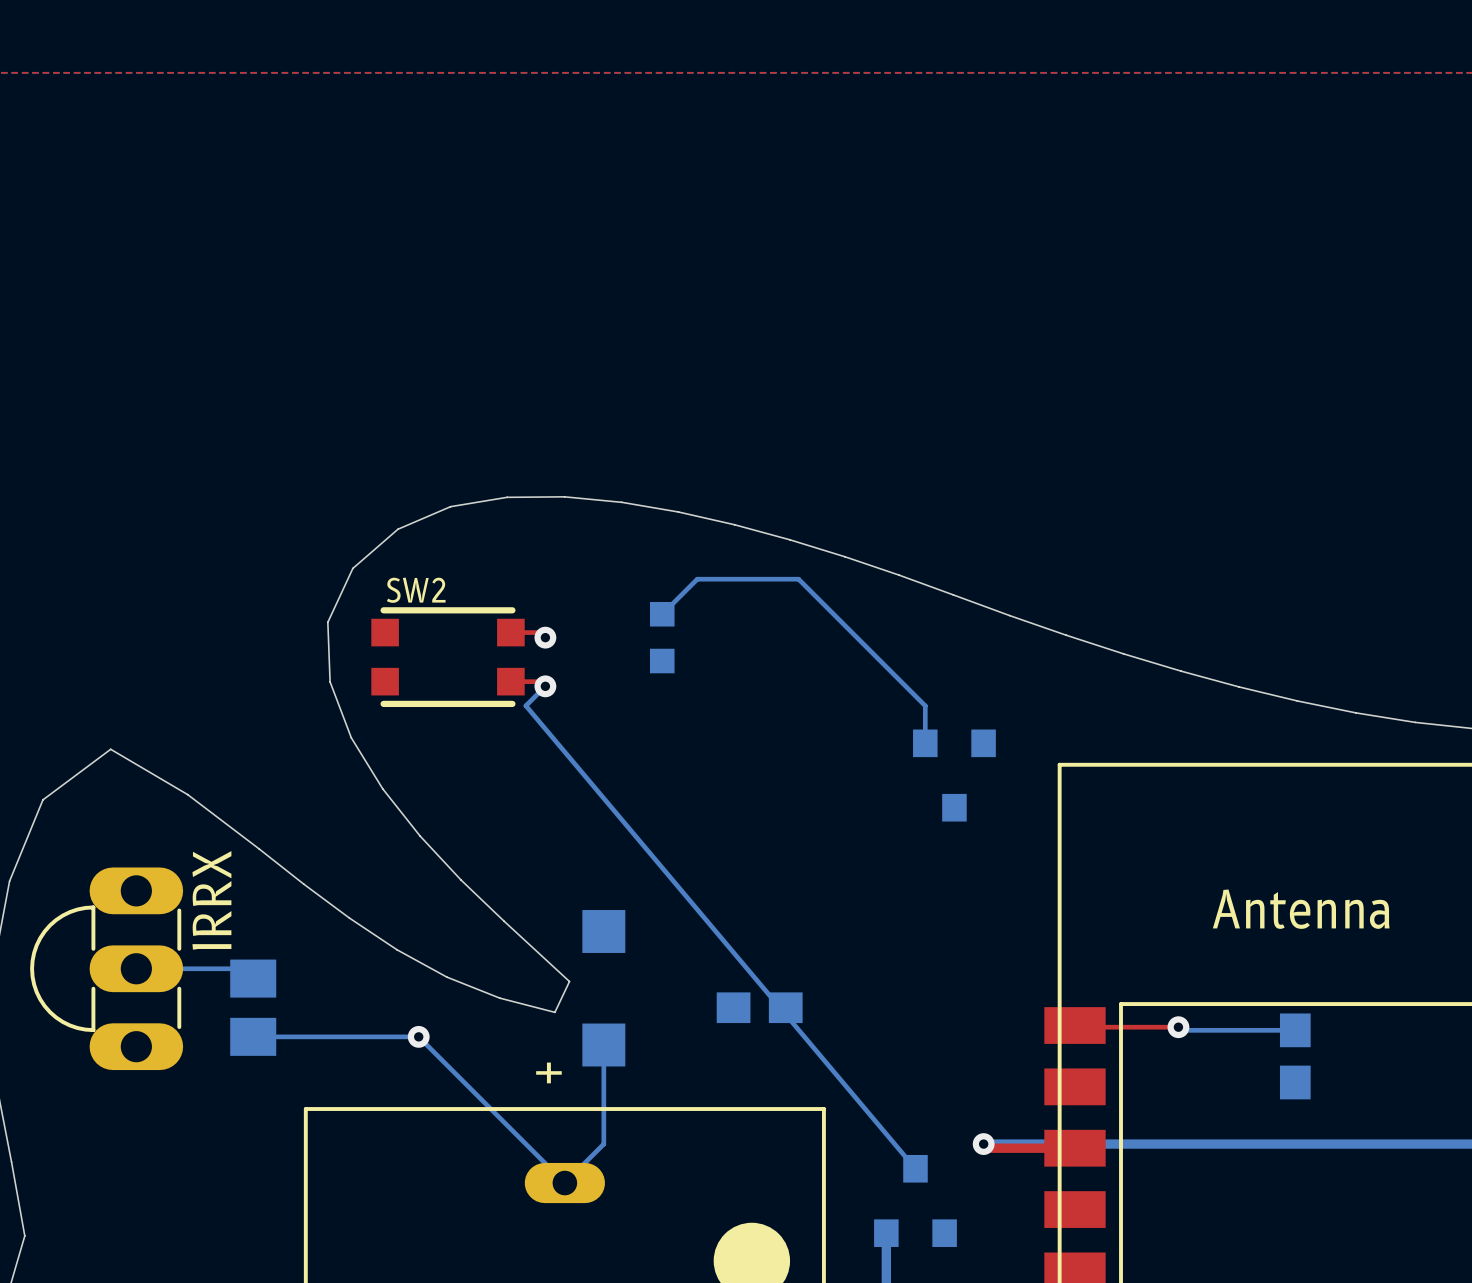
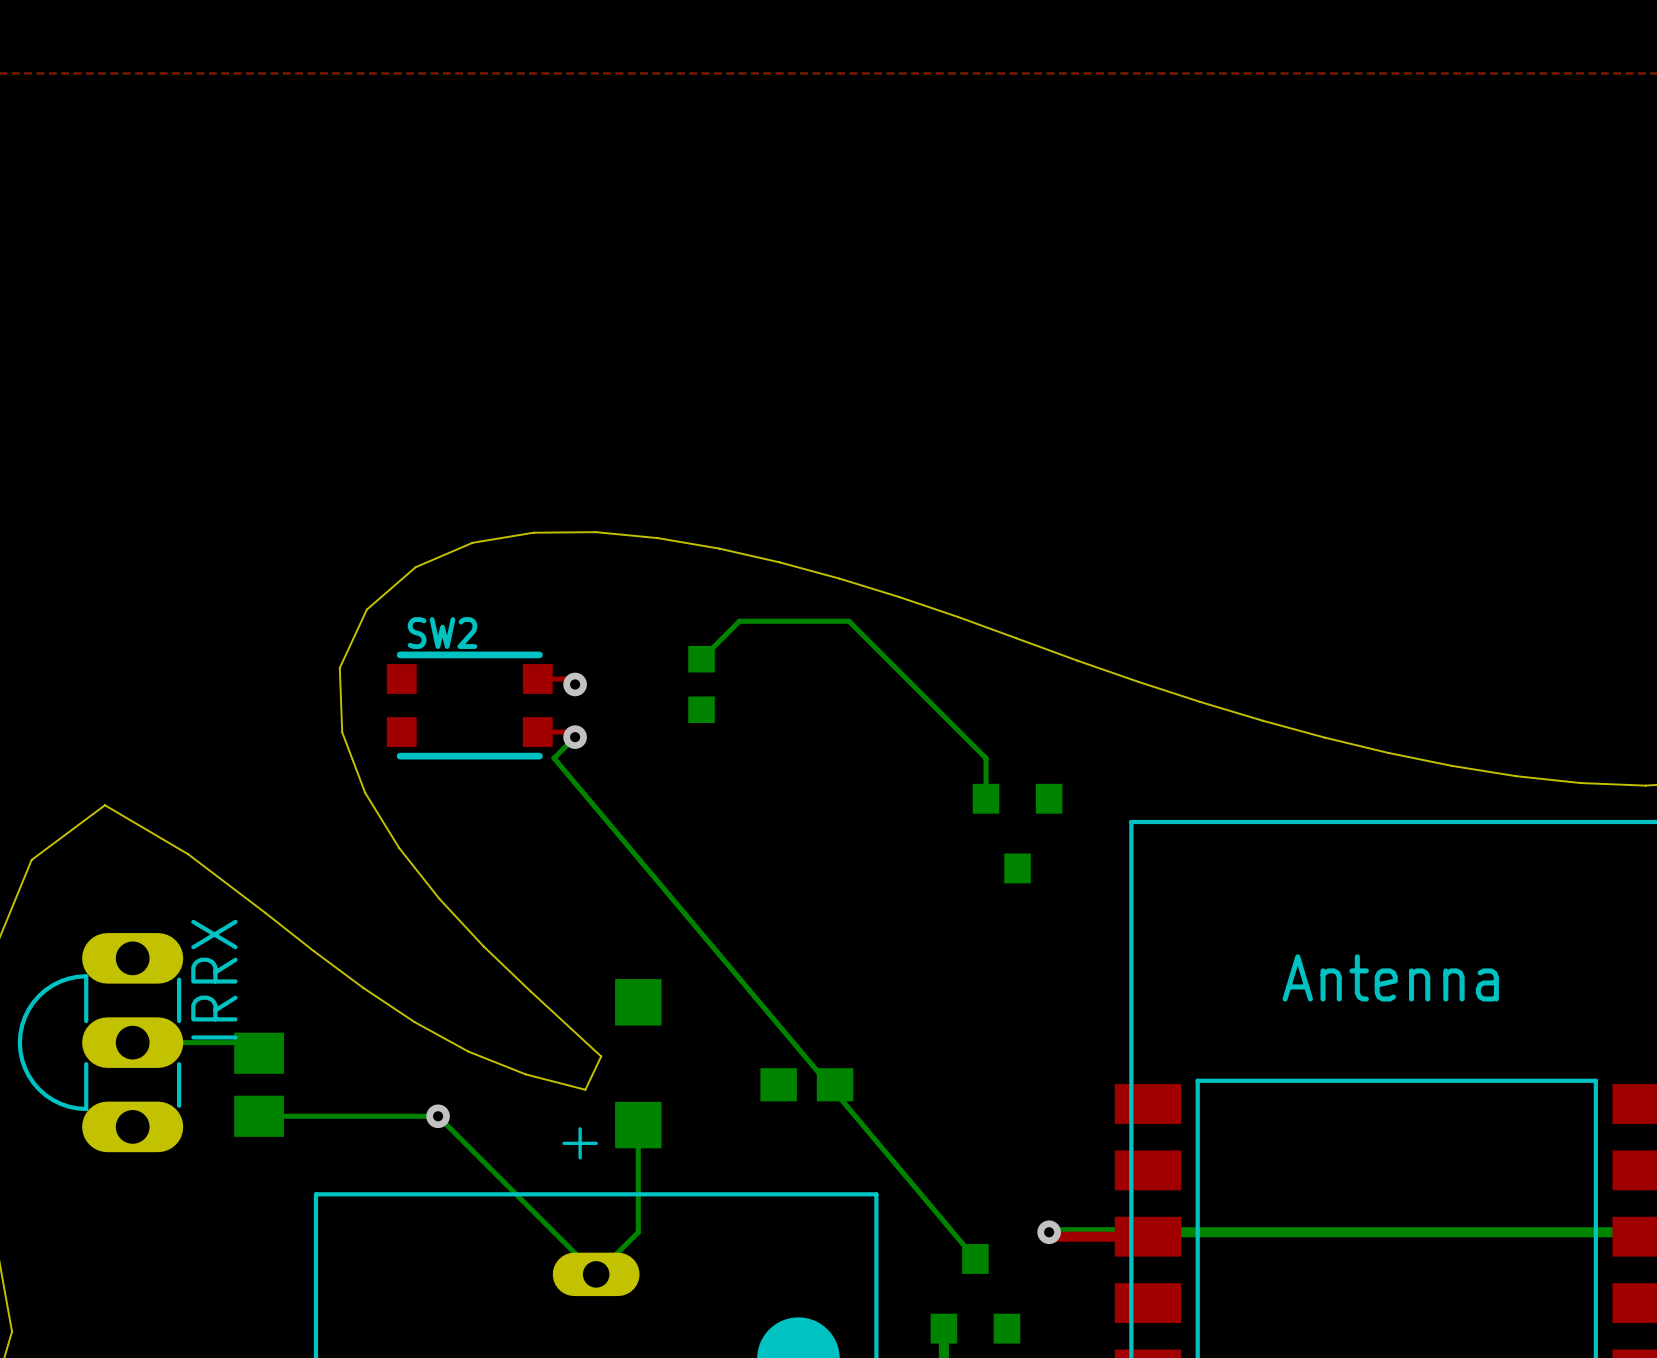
top track: (1074, 1025) (1076, 1027) (1178, 1027) -> none
bottom track: (1178, 1027) (1181, 1030) (1295, 1030) -> none
via: (1178, 1027) -> none
part: (1295, 1056) -> none

